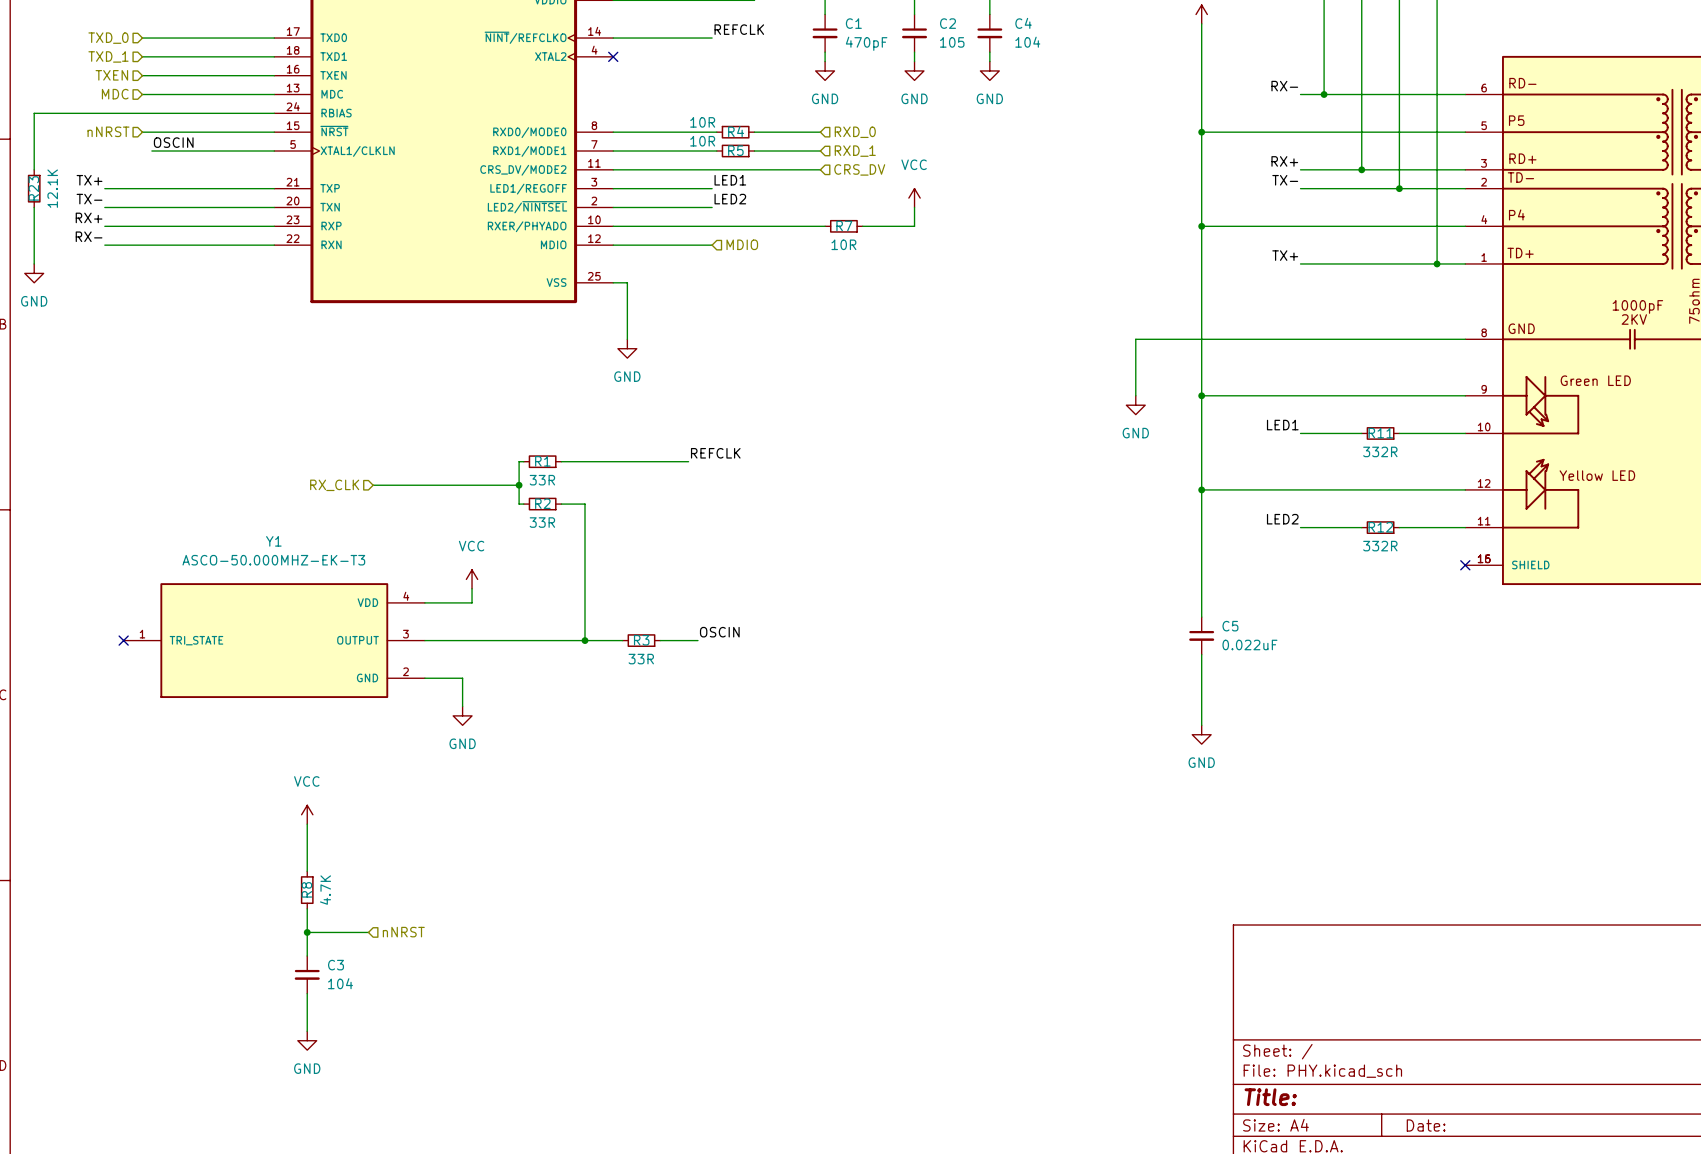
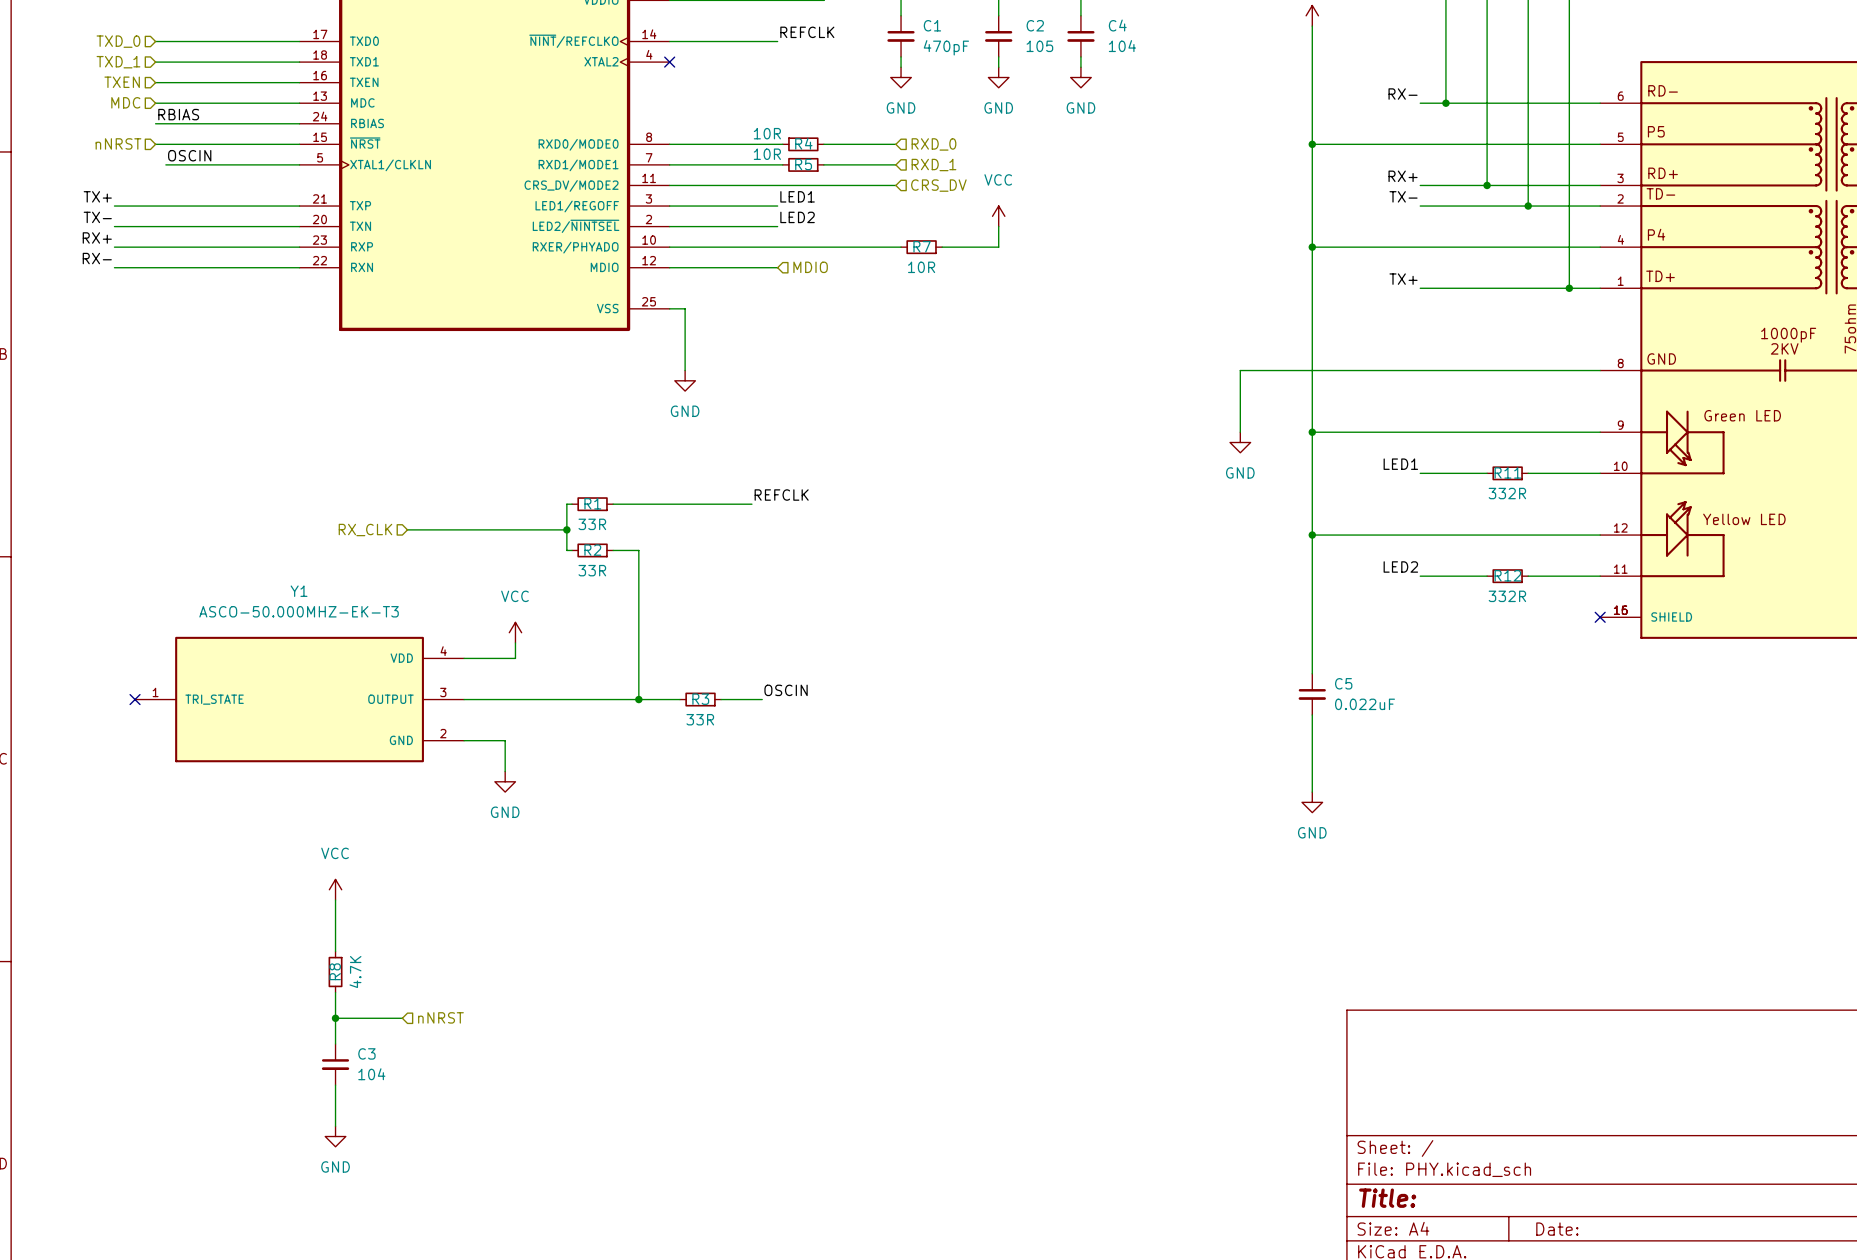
label: none -> RBIAS (178, 114)
wire: (142, 113) (34, 113) (34, 169) -> none
R23: 12.1K (34, 188) -> none
wire: (34, 207) (34, 263) -> none
power symbol: GND (34, 273) -> none

